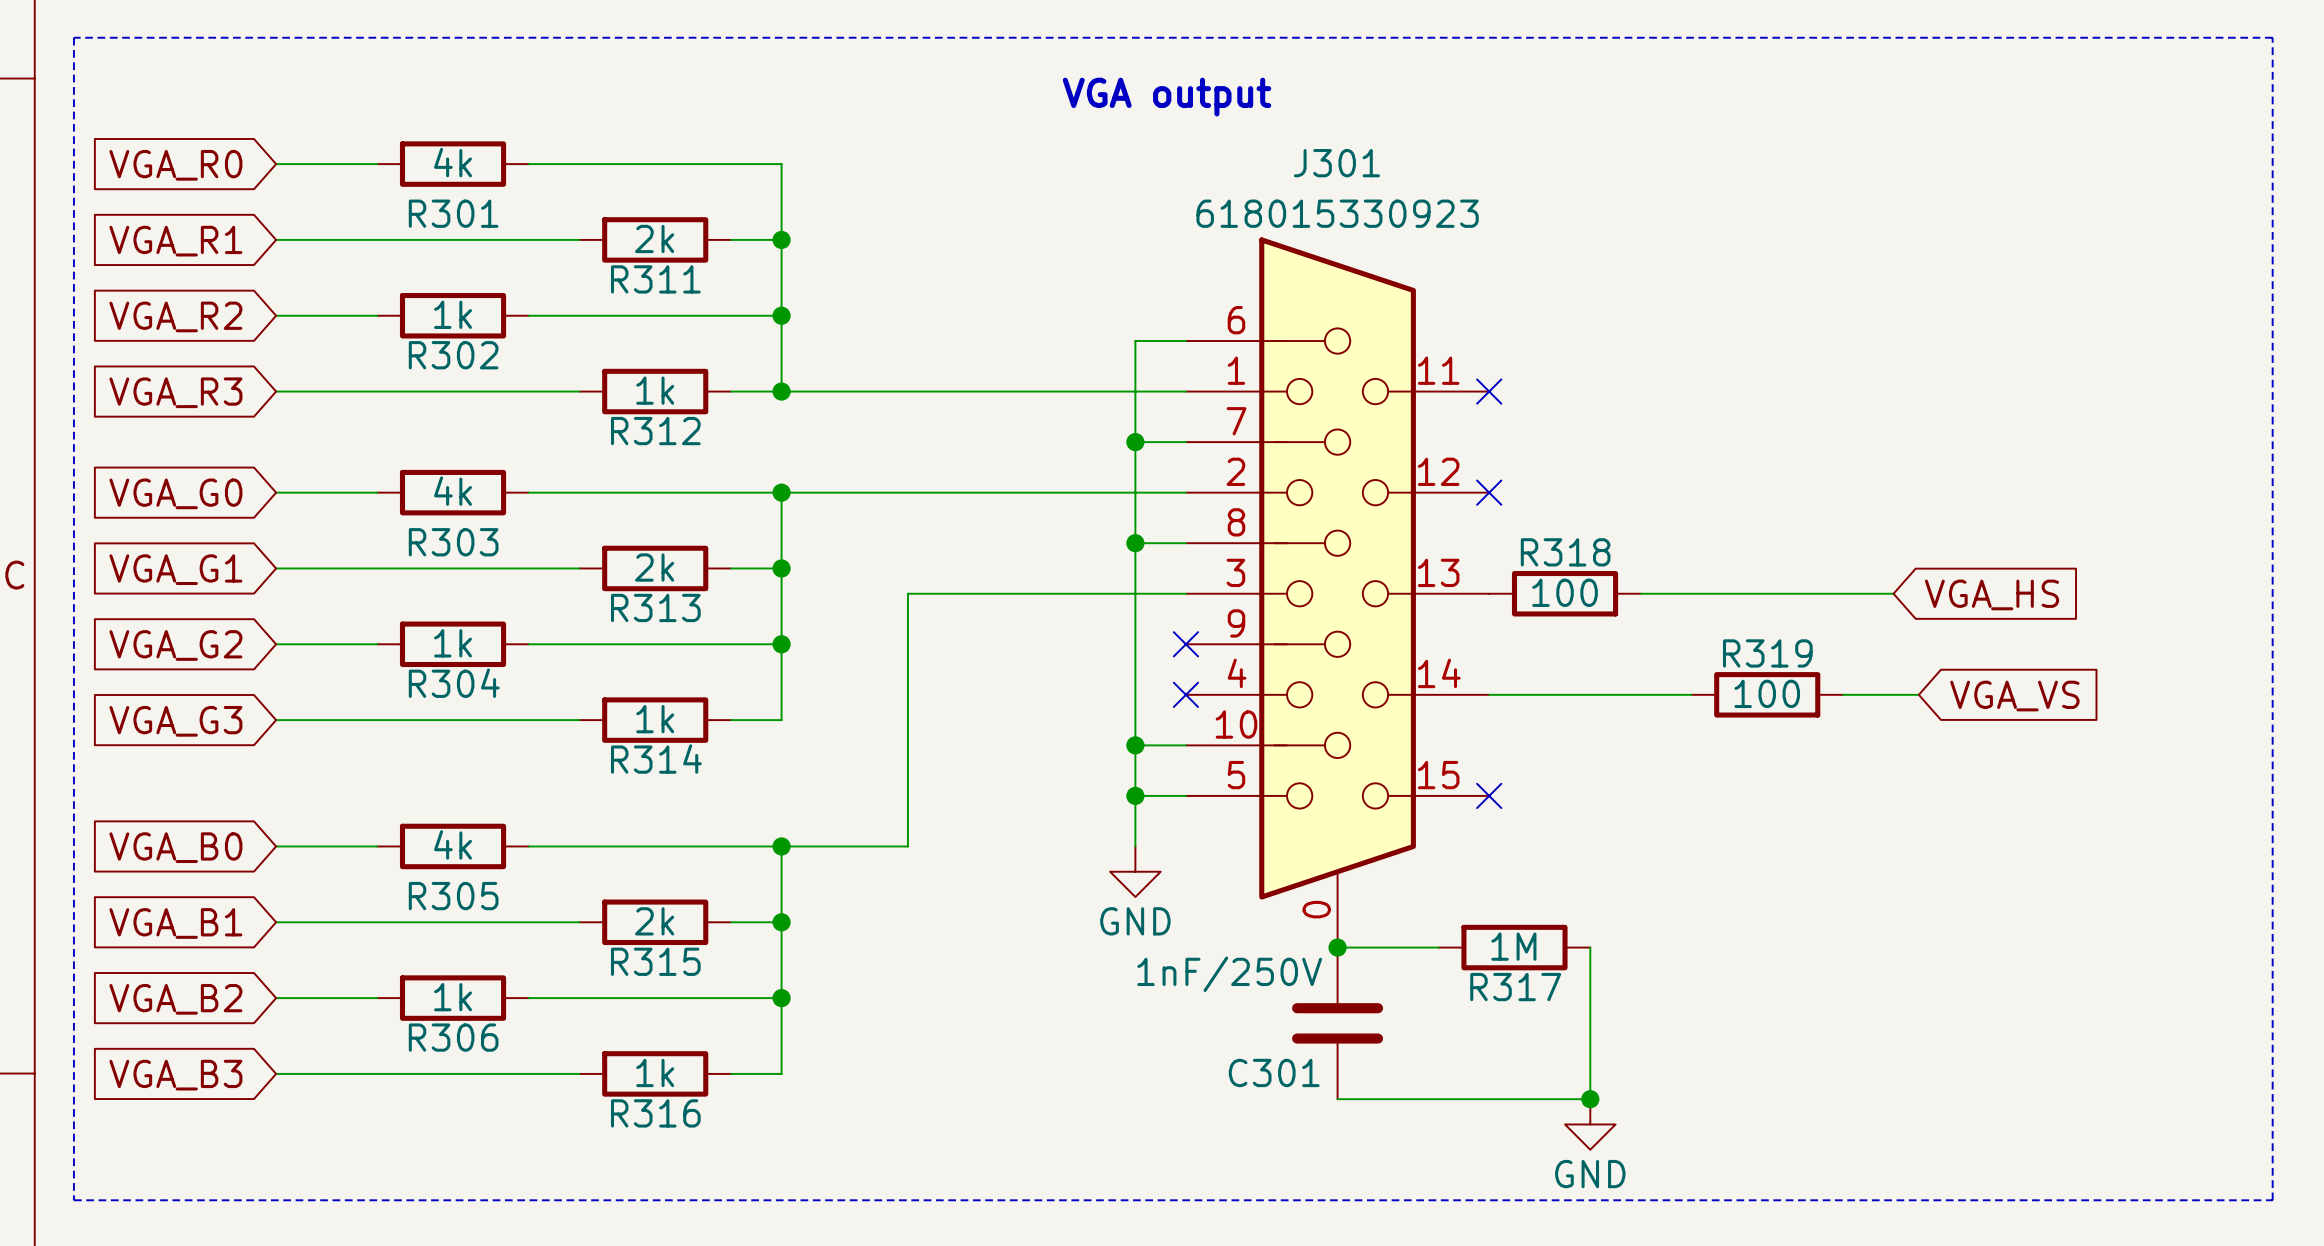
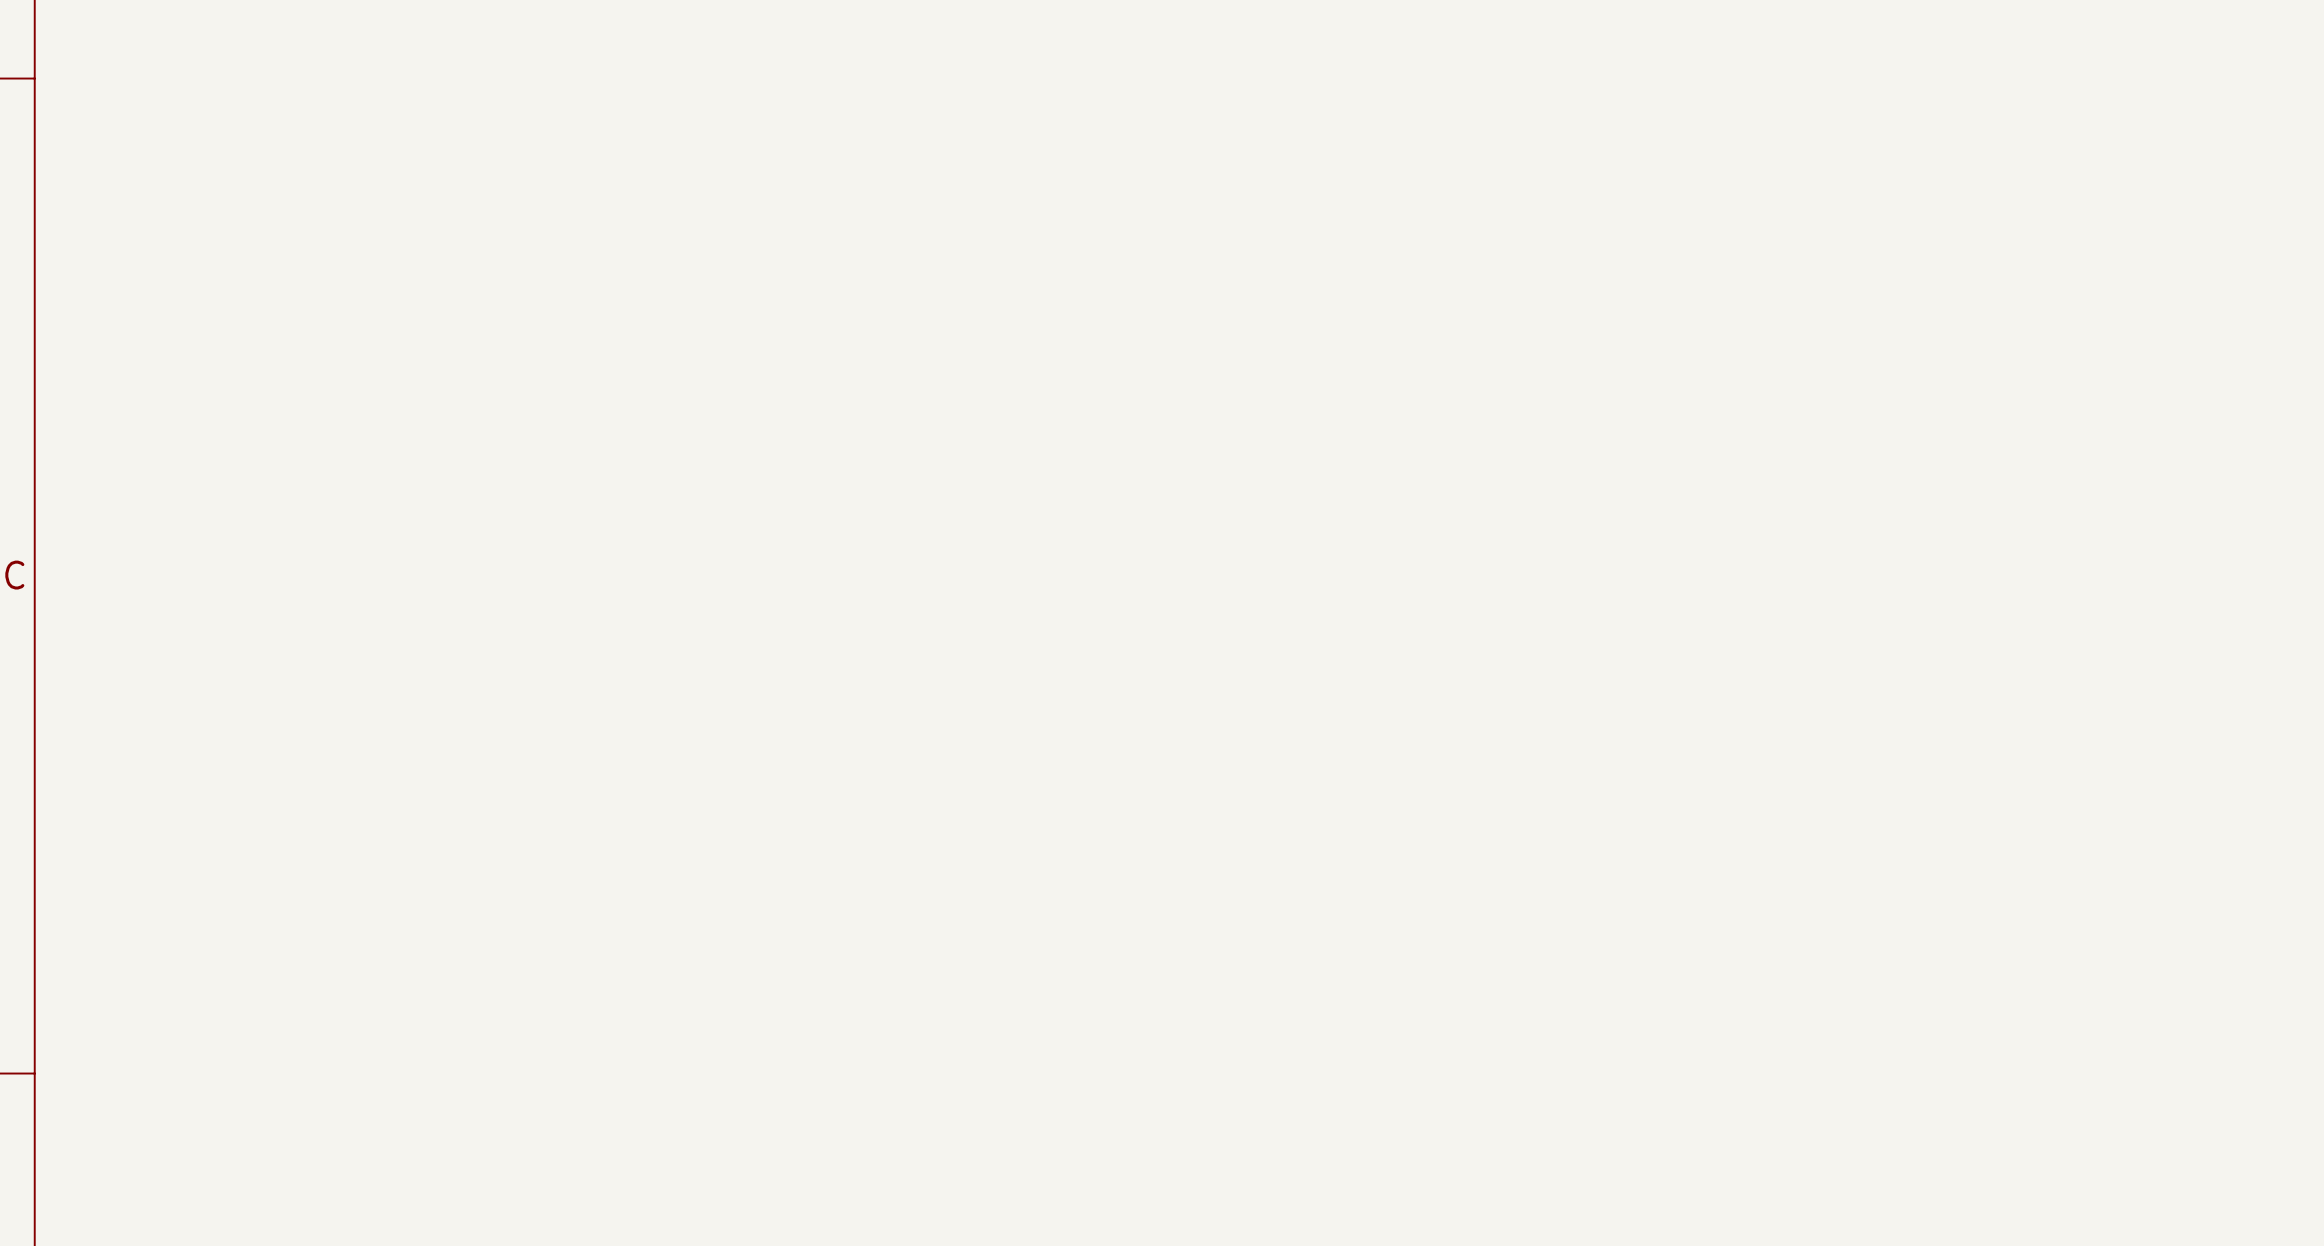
line: (73, 37) (2272, 37) (2272, 1200) (73, 1200) (73, 37) -> none
text: VGA output (1167, 97) -> none
wire: (276, 164) (377, 164) -> none
R301: 4k (453, 164) -> none
wire: (528, 164) (781, 164) (781, 391) -> none
global label: VGA_R0 (175, 165) -> none
wire: (276, 239) (579, 239) -> none
R311: 2k (655, 239) -> none
wire: (731, 239) (781, 239) -> none
junction: (781, 239) -> none
global label: VGA_R1 (175, 241) -> none
wire: (276, 315) (377, 315) -> none
R302: 1k (453, 315) -> none
wire: (528, 315) (781, 315) -> none
junction: (781, 315) -> none
global label: VGA_R2 (175, 316) -> none
wire: (1185, 341) (1135, 341) (1135, 846) -> none
wire: (276, 391) (579, 391) -> none
R312: 1k (655, 391) -> none
wire: (731, 391) (1185, 391) -> none
junction: (781, 391) -> none
no-connect mark: (1489, 391) -> none
global label: VGA_R3 (175, 392) -> none
wire: (1135, 442) (1185, 442) -> none
junction: (1135, 442) -> none
wire: (276, 492) (377, 492) -> none
R303: 4k (453, 492) -> none
wire: (528, 492) (1185, 492) -> none
wire: (781, 492) (781, 720) (731, 720) -> none
junction: (781, 492) -> none
no-connect mark: (1489, 492) -> none
global label: VGA_G0 (175, 493) -> none
wire: (1135, 543) (1185, 543) -> none
junction: (1135, 543) -> none
wire: (276, 568) (579, 568) -> none
R313: 2k (655, 568) -> none
wire: (731, 568) (781, 568) -> none
junction: (781, 568) -> none
global label: VGA_G1 (175, 569) -> none
J301: 618015330923 (1337, 592) -> none
wire: (1185, 593) (907, 593) (907, 846) (528, 846) -> none
R318: 100 (1565, 593) -> none
wire: (1640, 593) (1893, 593) -> none
global label: VGA_HS (1992, 594) -> none
wire: (276, 644) (377, 644) -> none
R304: 1k (453, 644) -> none
wire: (528, 644) (781, 644) -> none
junction: (781, 644) -> none
no-connect mark: (1185, 644) -> none
global label: VGA_G2 (175, 645) -> none
no-connect mark: (1185, 694) -> none
wire: (1489, 694) (1691, 694) -> none
R319: 100 (1767, 694) -> none
wire: (1843, 694) (1918, 694) -> none
global label: VGA_VS (2014, 696) -> none
wire: (276, 720) (579, 720) -> none
R314: 1k (655, 720) -> none
global label: VGA_G3 (175, 721) -> none
wire: (1135, 745) (1185, 745) -> none
junction: (1135, 745) -> none
wire: (1135, 795) (1185, 795) -> none
junction: (1135, 795) -> none
no-connect mark: (1489, 795) -> none
wire: (276, 846) (377, 846) -> none
R305: 4k (453, 846) -> none
wire: (781, 846) (781, 1073) (731, 1073) -> none
junction: (781, 846) -> none
global label: VGA_B0 (175, 847) -> none
power symbol: GND (1135, 871) -> none
wire: (276, 922) (579, 922) -> none
R315: 2k (655, 922) -> none
wire: (731, 922) (781, 922) -> none
junction: (781, 922) -> none
global label: VGA_B1 (175, 923) -> none
wire: (1337, 947) (1438, 947) -> none
junction: (1337, 947) -> none
R317: 1M (1514, 947) -> none
wire: (1590, 947) (1590, 1099) (1337, 1099) -> none
wire: (276, 998) (377, 998) -> none
R306: 1k (453, 998) -> none
wire: (528, 998) (781, 998) -> none
junction: (781, 998) -> none
global label: VGA_B2 (175, 999) -> none
C301: 1nF/250V (1337, 1023) -> none
wire: (276, 1073) (579, 1073) -> none
R316: 1k (655, 1073) -> none
global label: VGA_B3 (175, 1075) -> none
junction: (1590, 1099) -> none
power symbol: GND (1590, 1124) -> none

